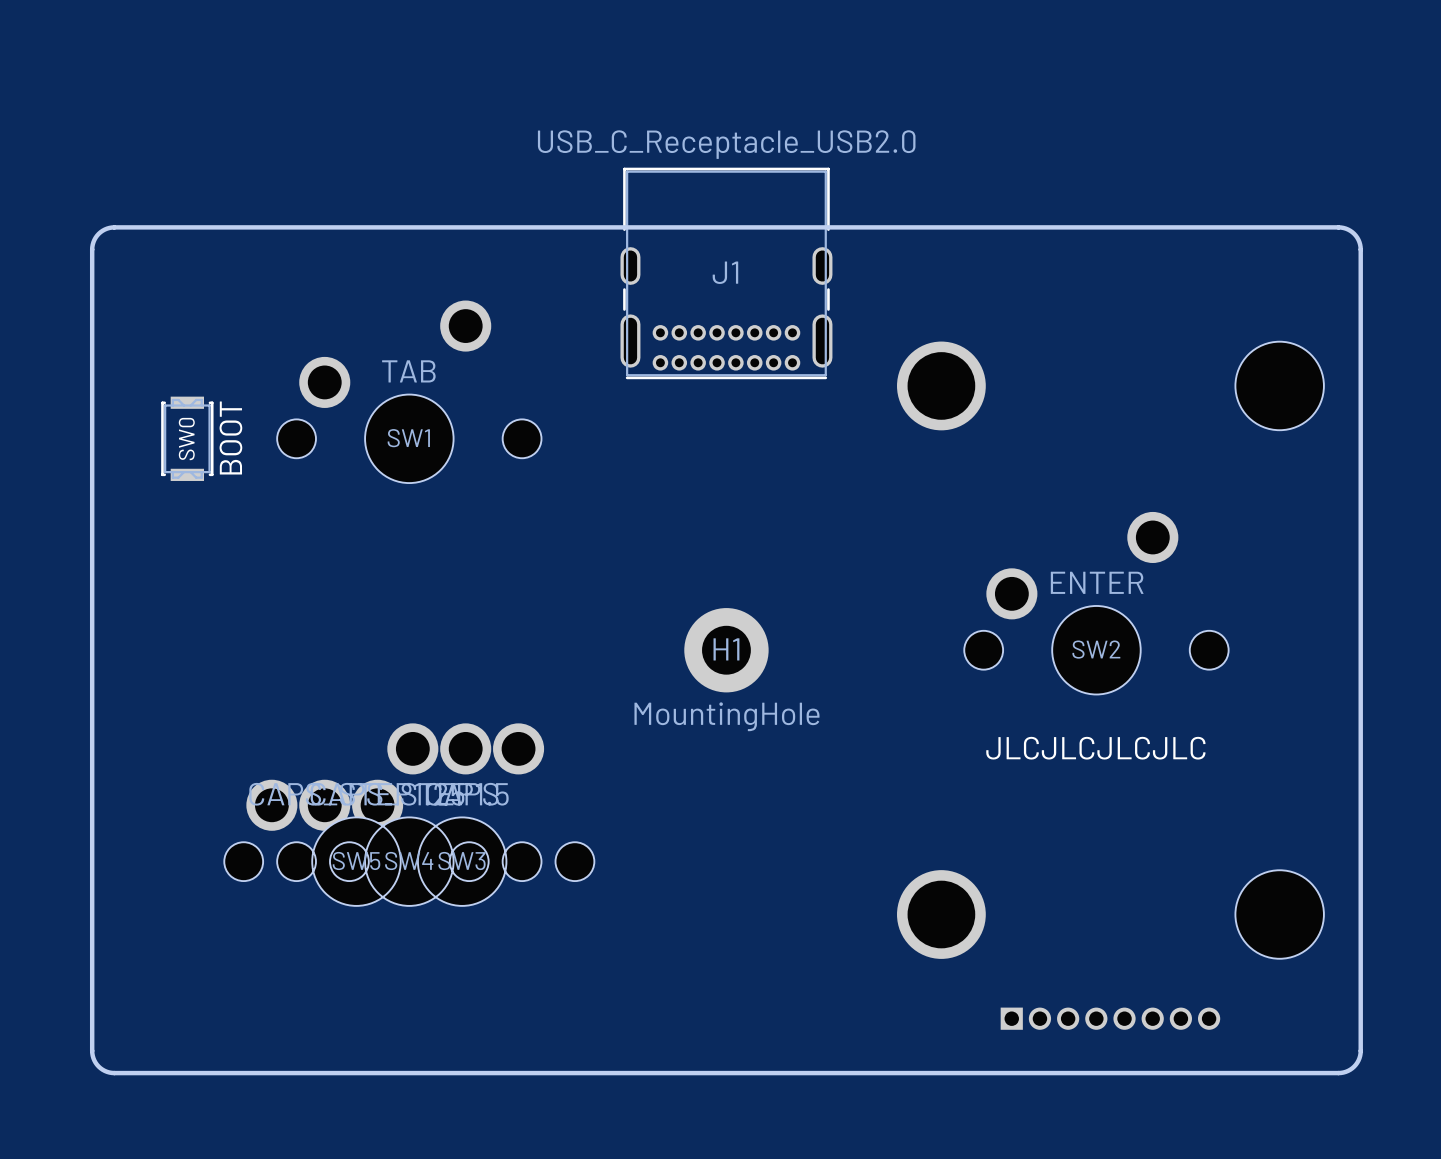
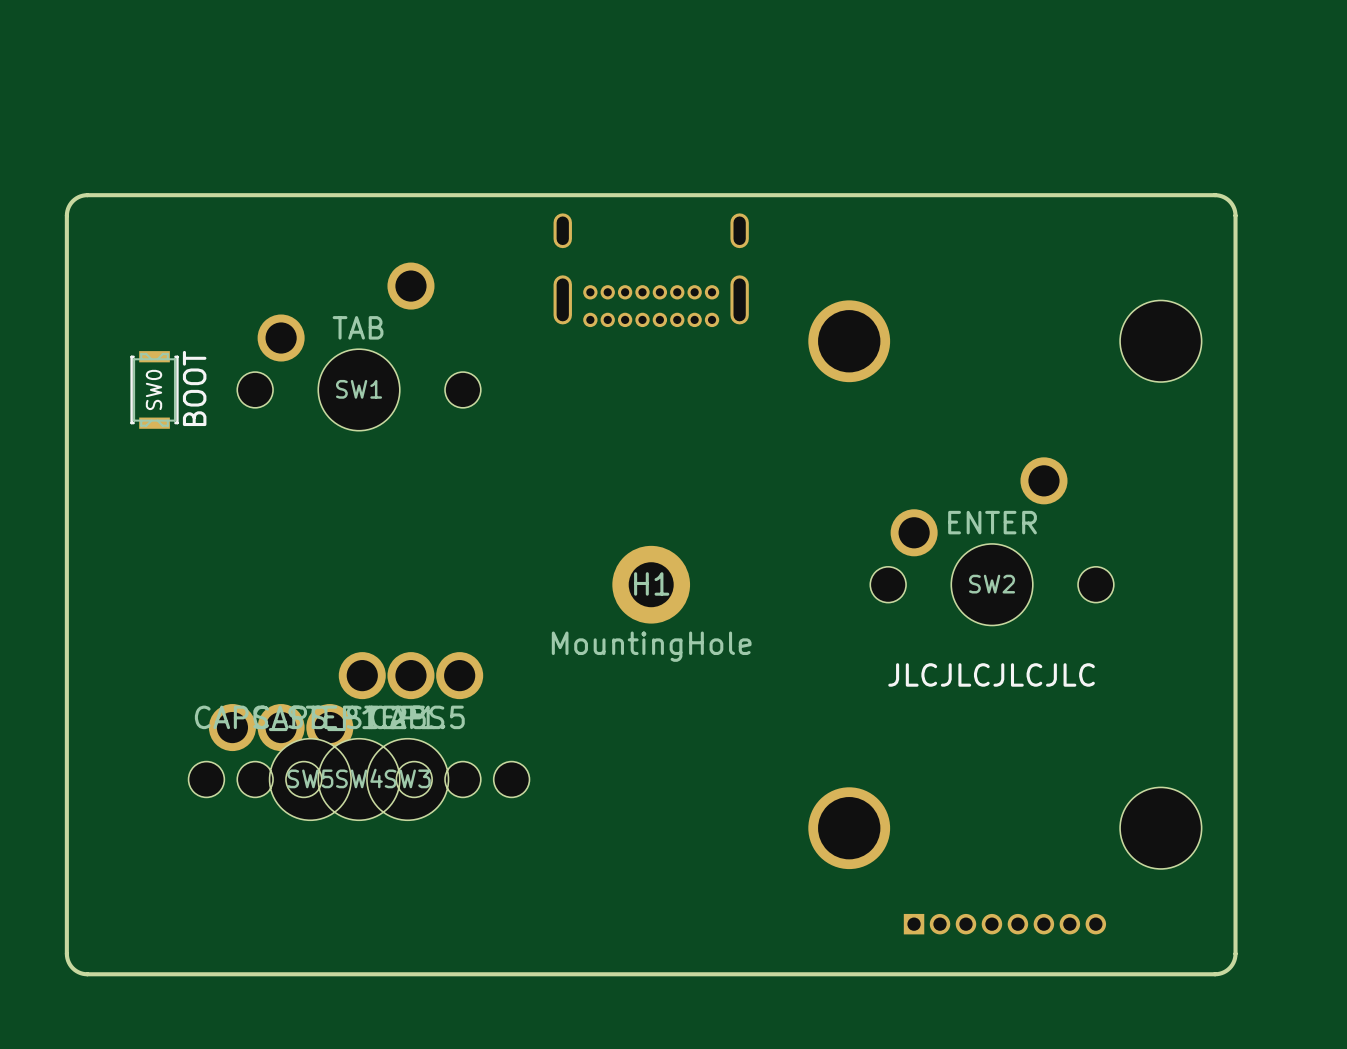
J1 side: top (726, 273) -> bottom (651, 270)

